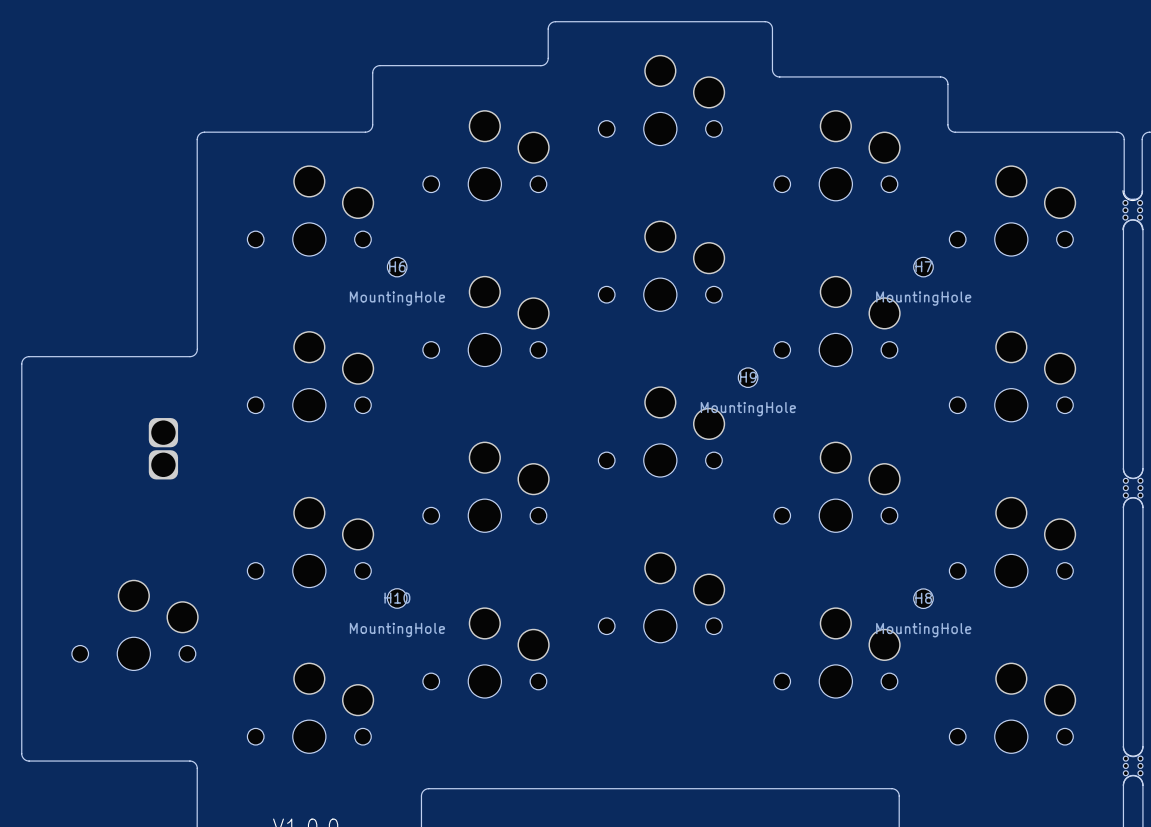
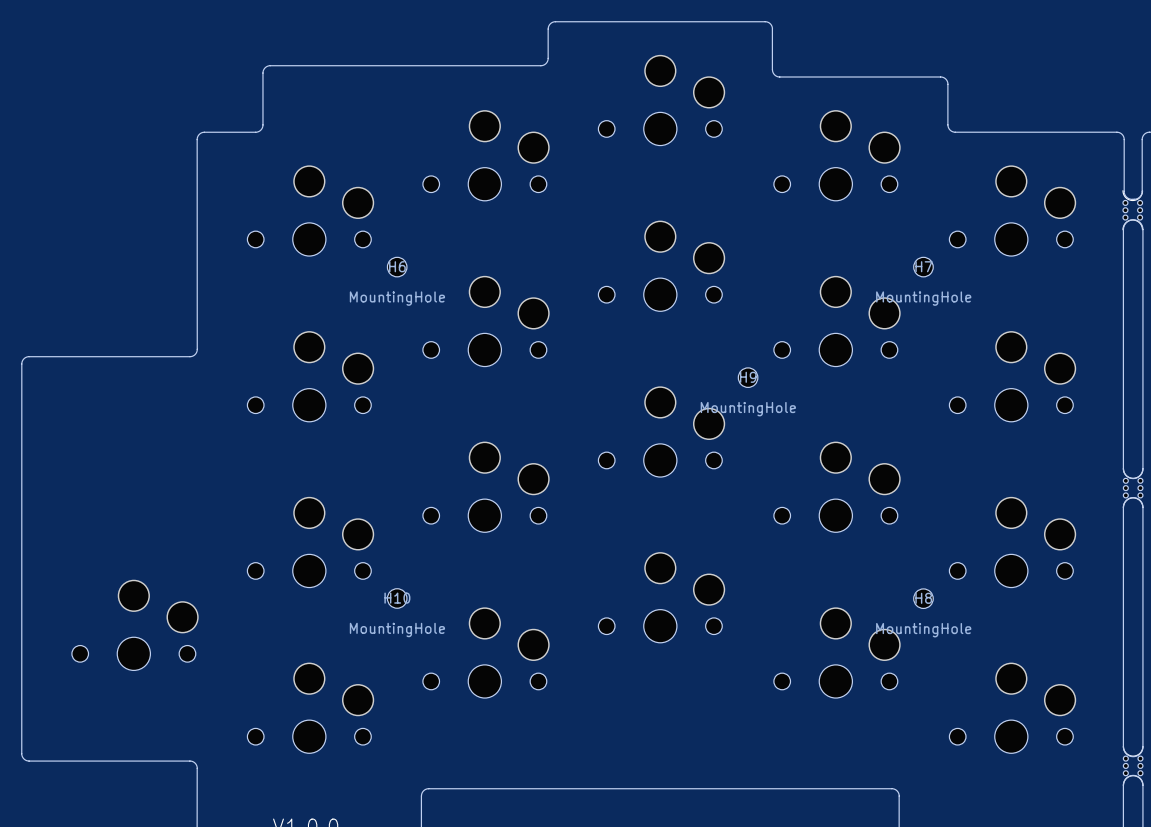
board edge: (548, 58) (546, 63) (540, 65) (377, 66) (372, 71) (372, 125) (367, 131) (204, 132) (199, 133) (197, 139) (197, 349) (195, 354) (189, 356) -> (548, 58) (546, 63) (540, 65) (265, 67) (263, 72) (262, 124) (260, 130) (255, 132) (203, 132) (197, 137) (197, 349) (195, 354) (189, 356)
part: (163, 448) -> none

